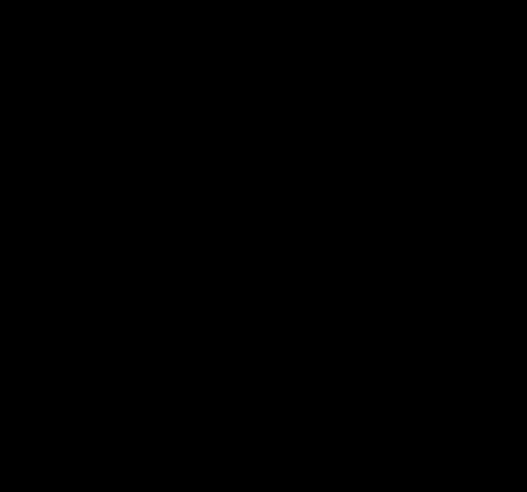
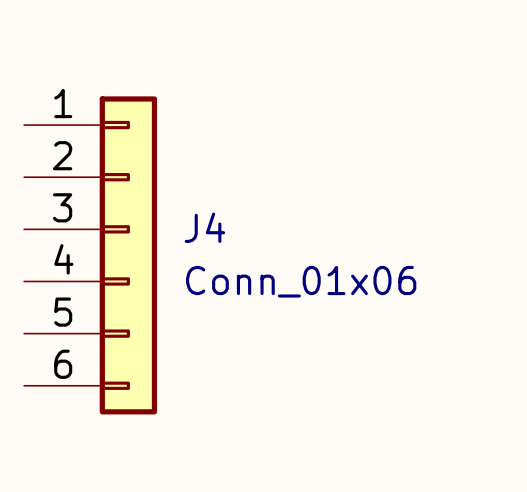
J4: none -> Conn_01x06 (90, 255)

